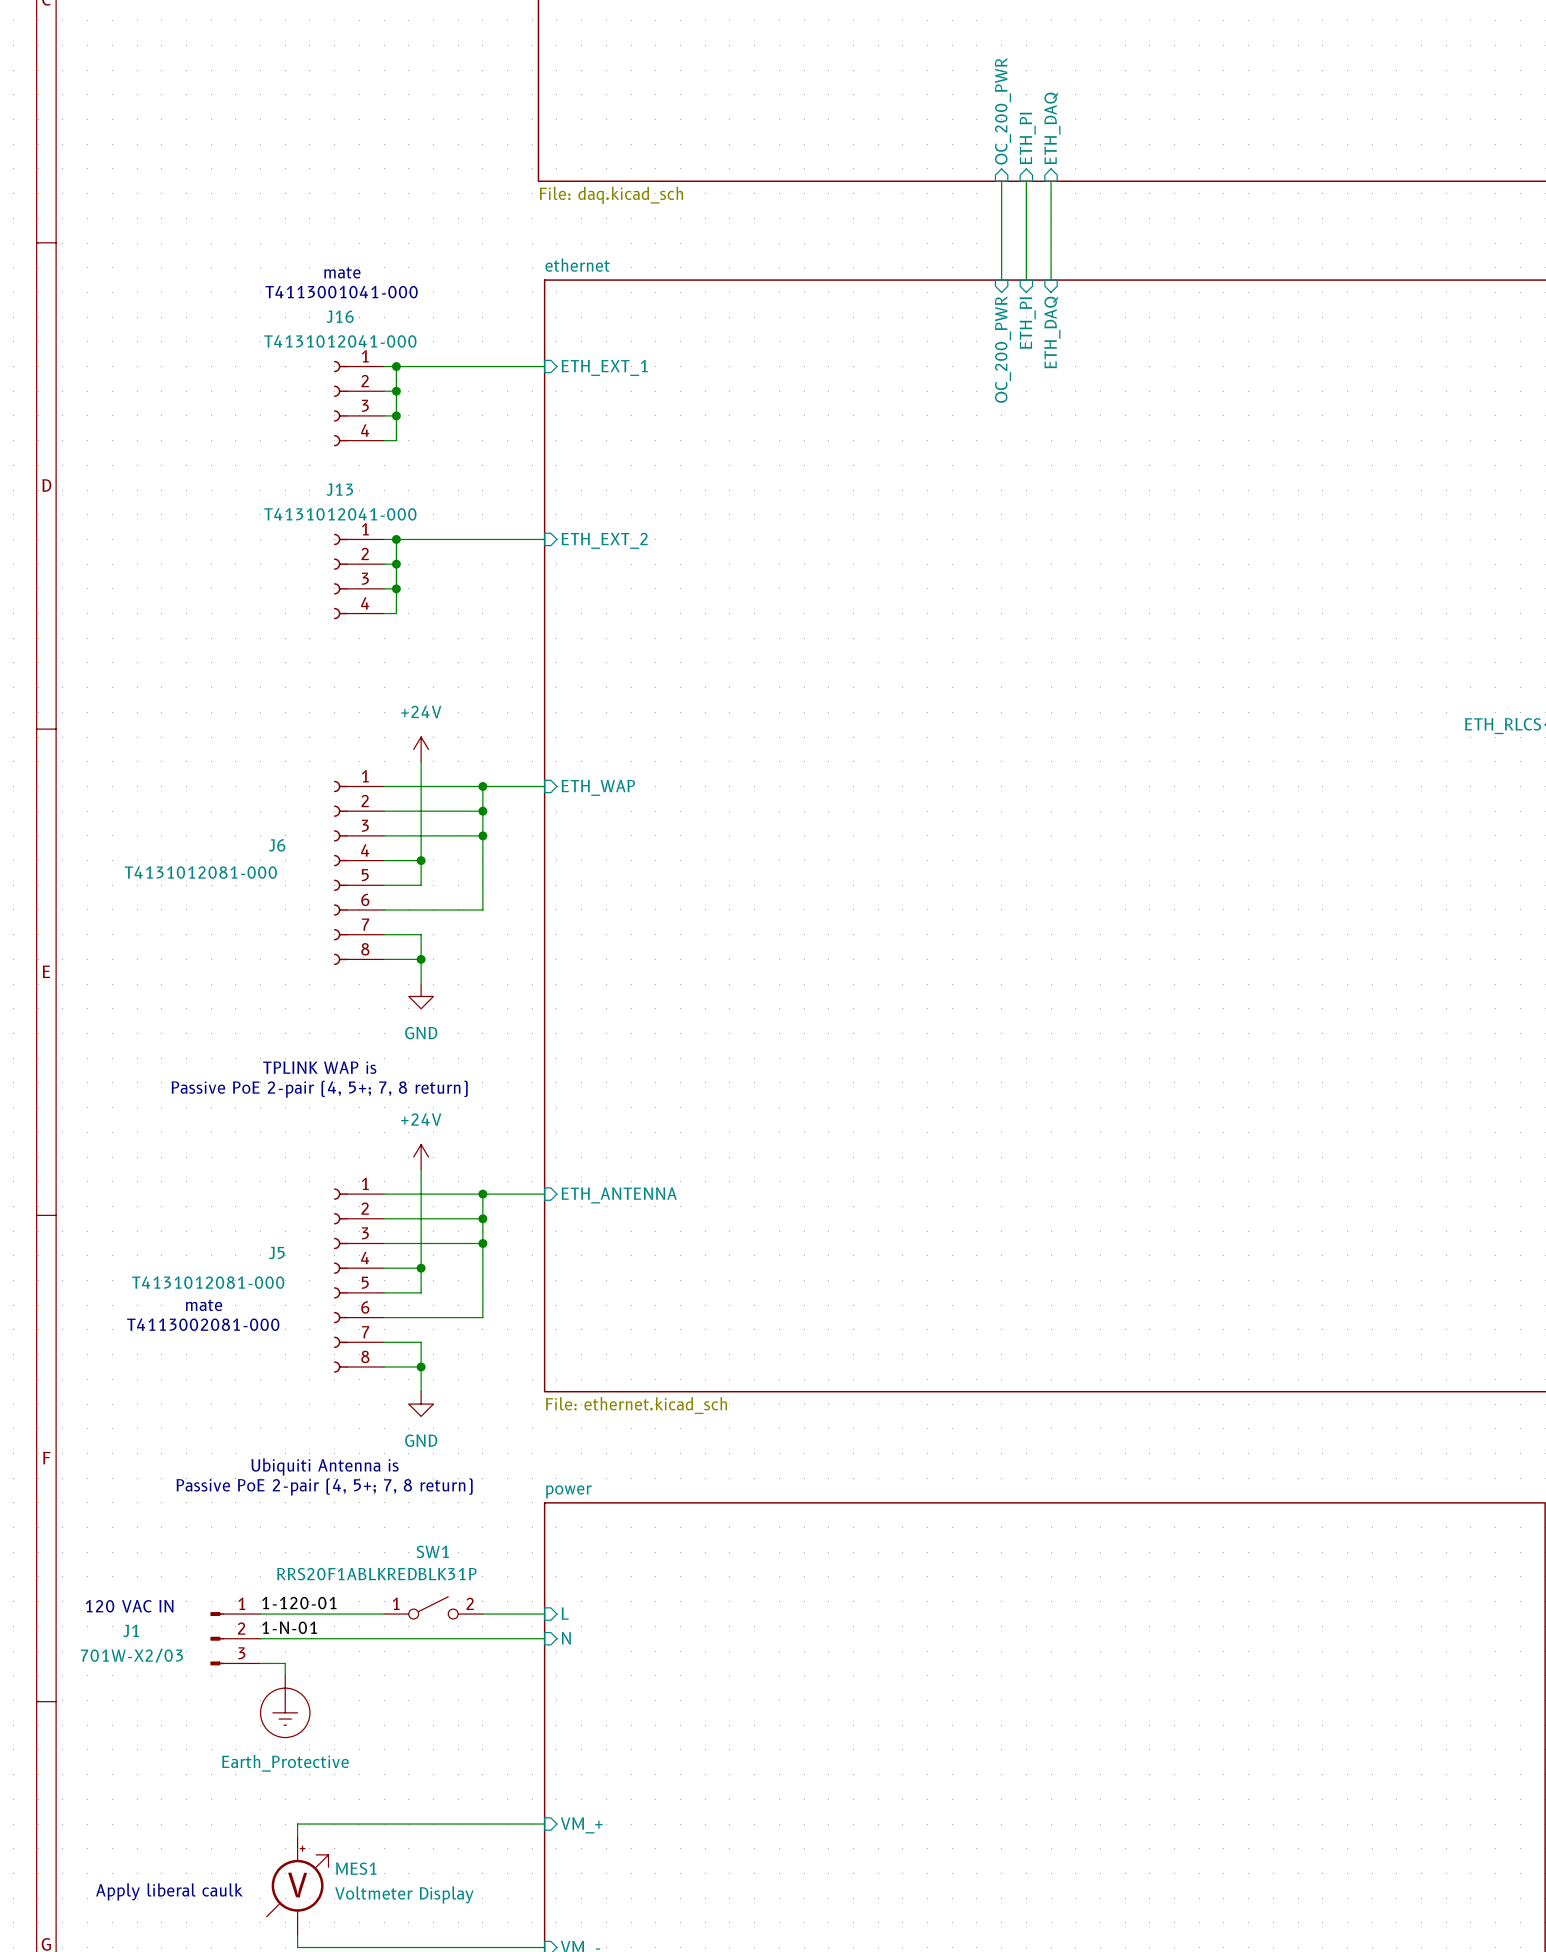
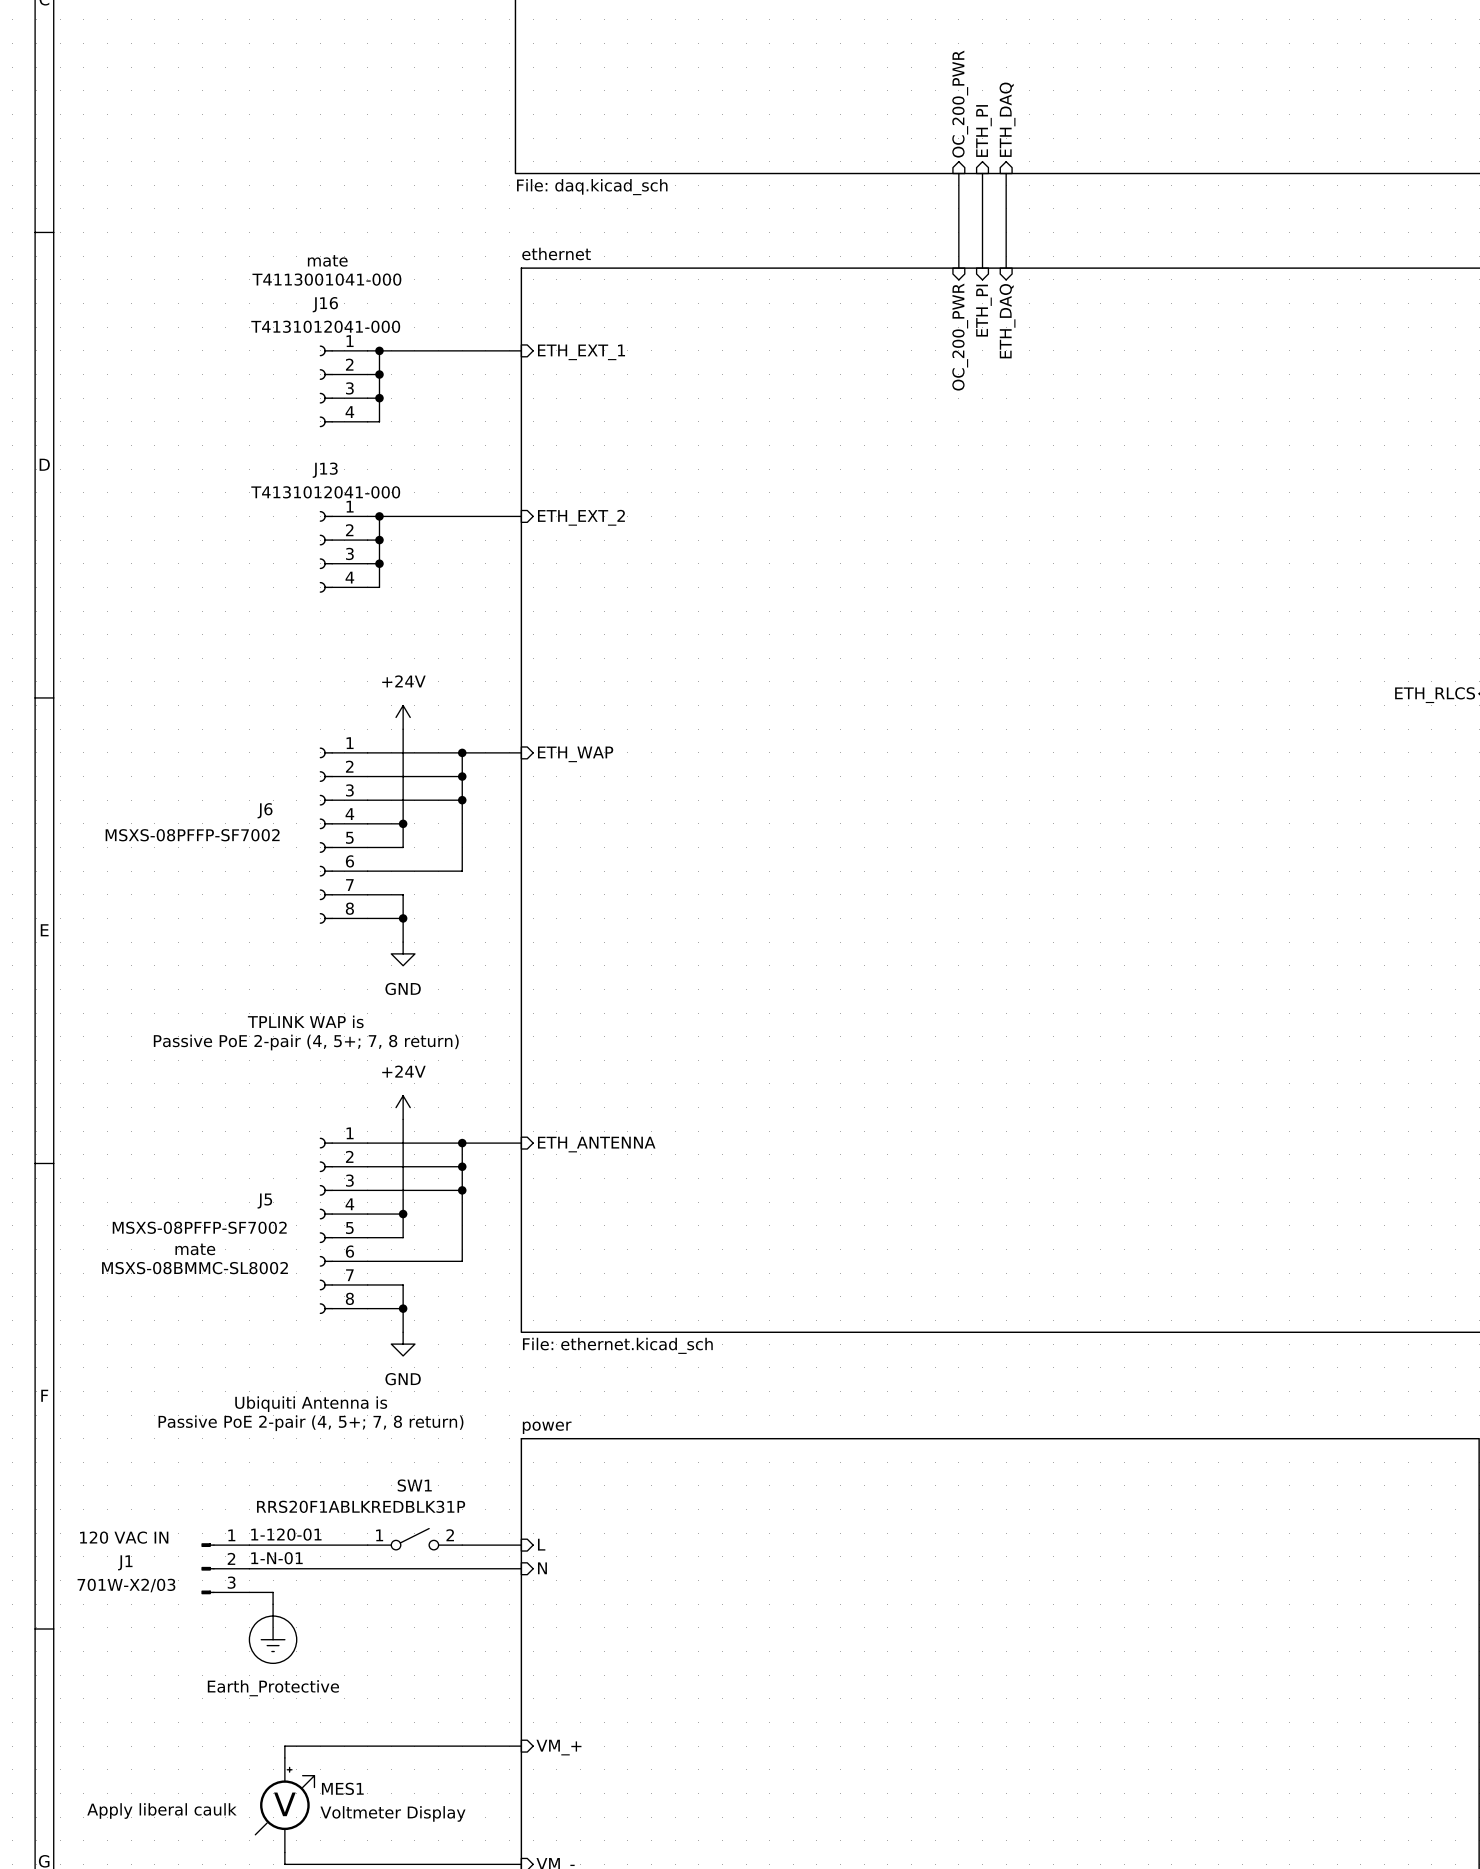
J6 value: T4131012081-000 (200, 872) -> MSXS-08PFFP-SF7002 (192, 835)
J5 value: T4131012081-000 (208, 1282) -> MSXS-08PFFP-SF7002 (199, 1227)
text: T4113002081-000 (203, 1324) -> MSXS-08BMMC-SL8002 (195, 1268)

